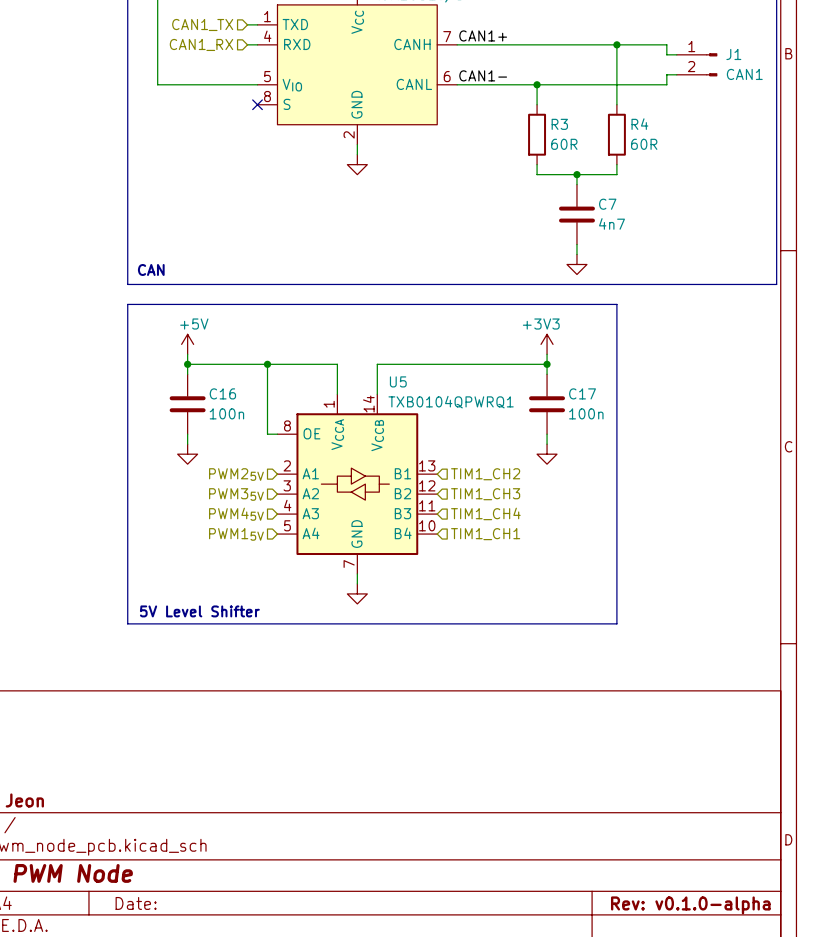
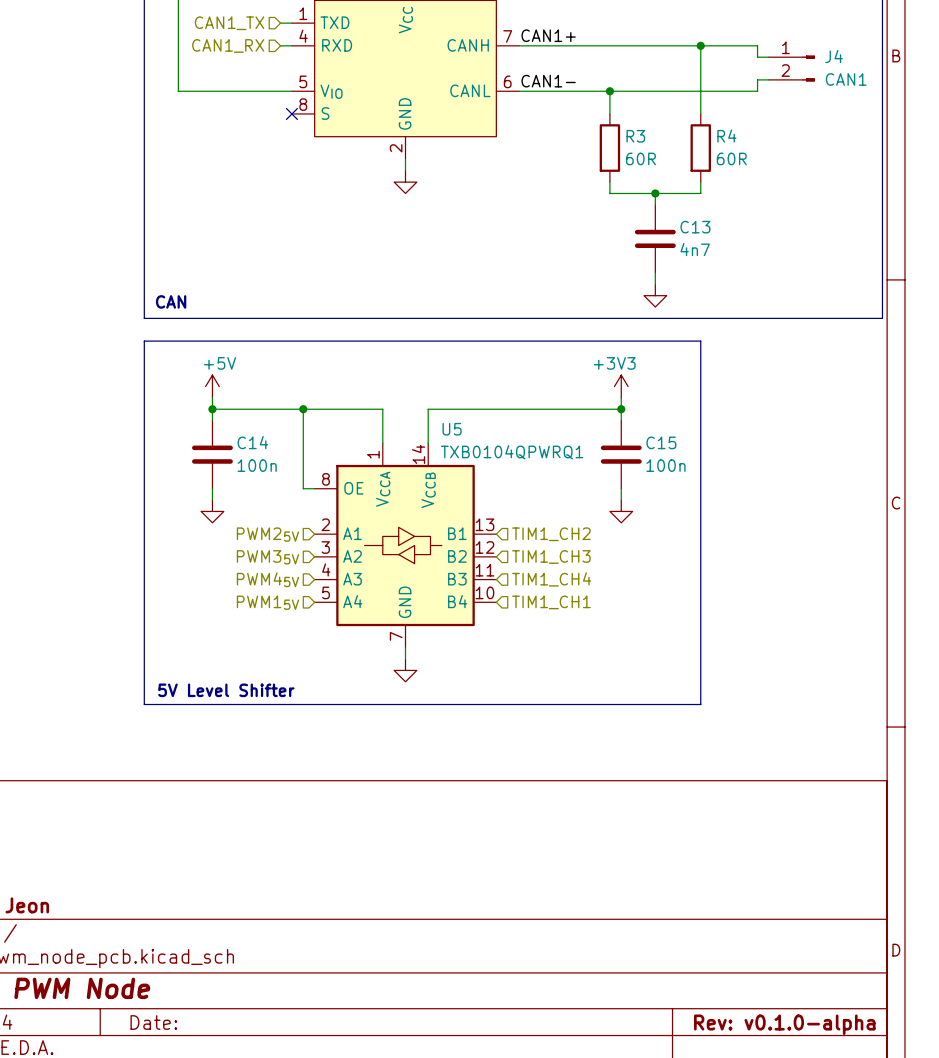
J1 name: J1 (733, 54) -> J4 (834, 56)
C7 name: C7 (607, 204) -> C13 (695, 227)
C16 name: C16 (222, 393) -> C14 (252, 442)
C17 name: C17 (582, 393) -> C15 (661, 442)

